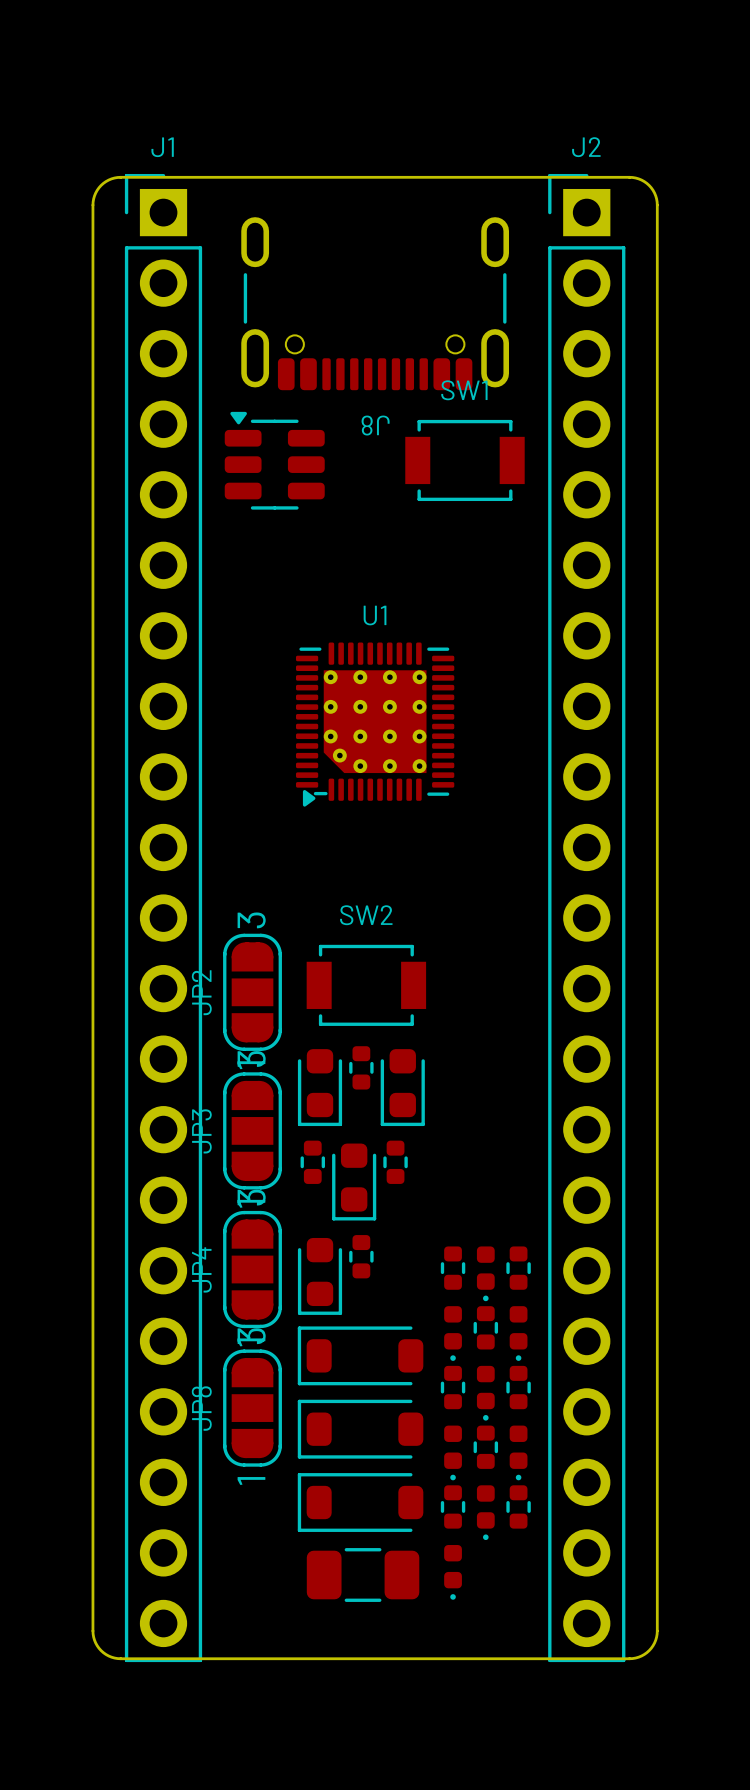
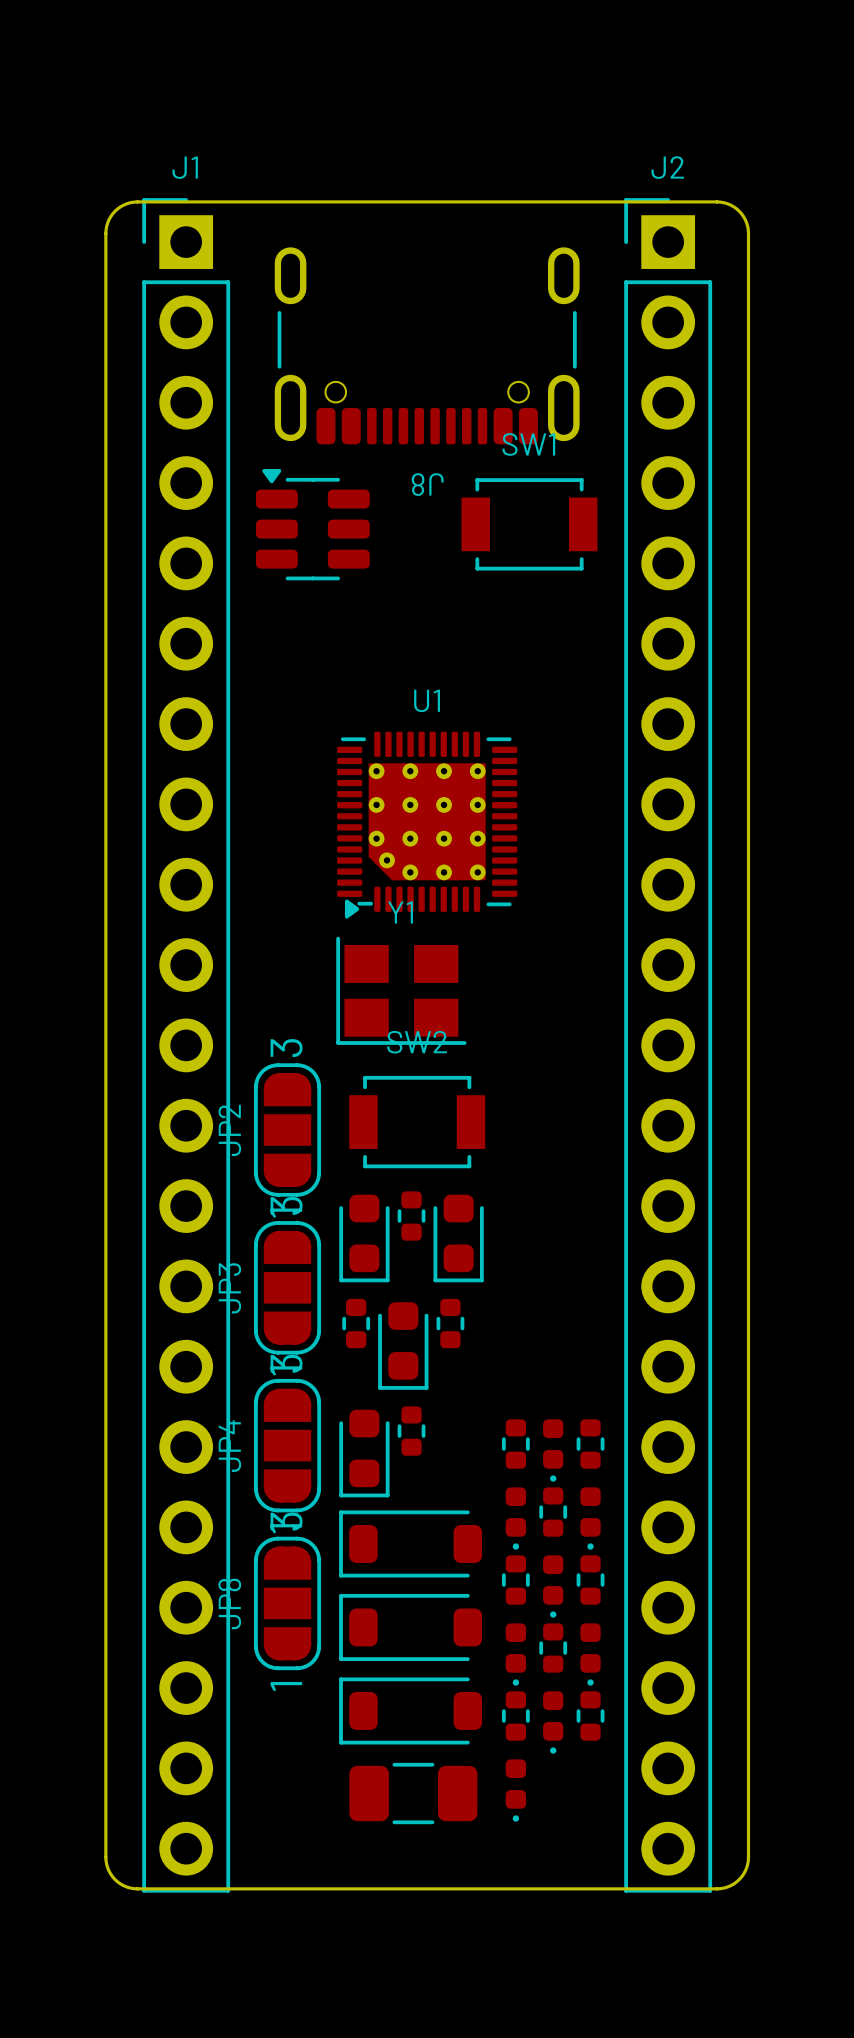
Y1: none -> (401, 990)

